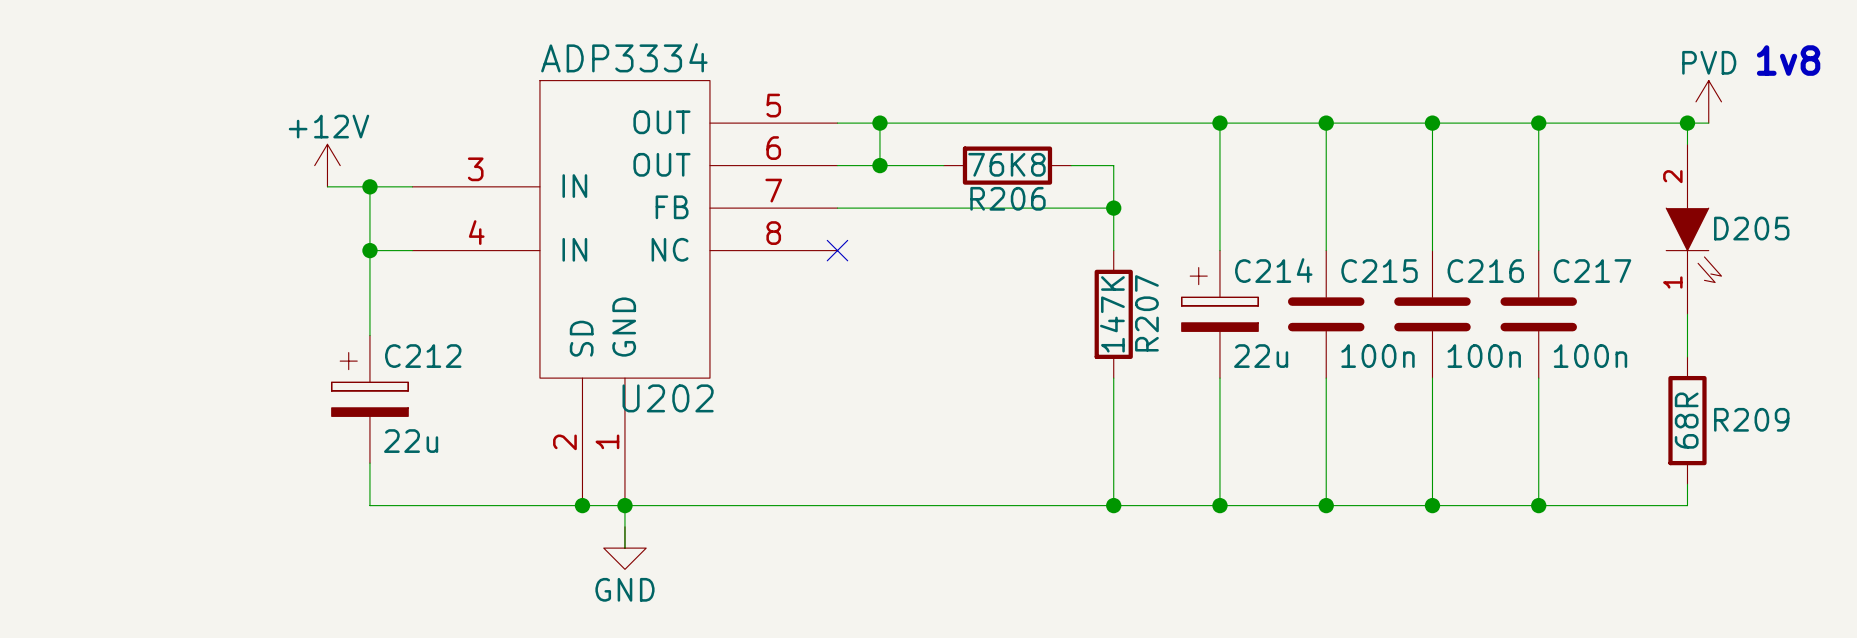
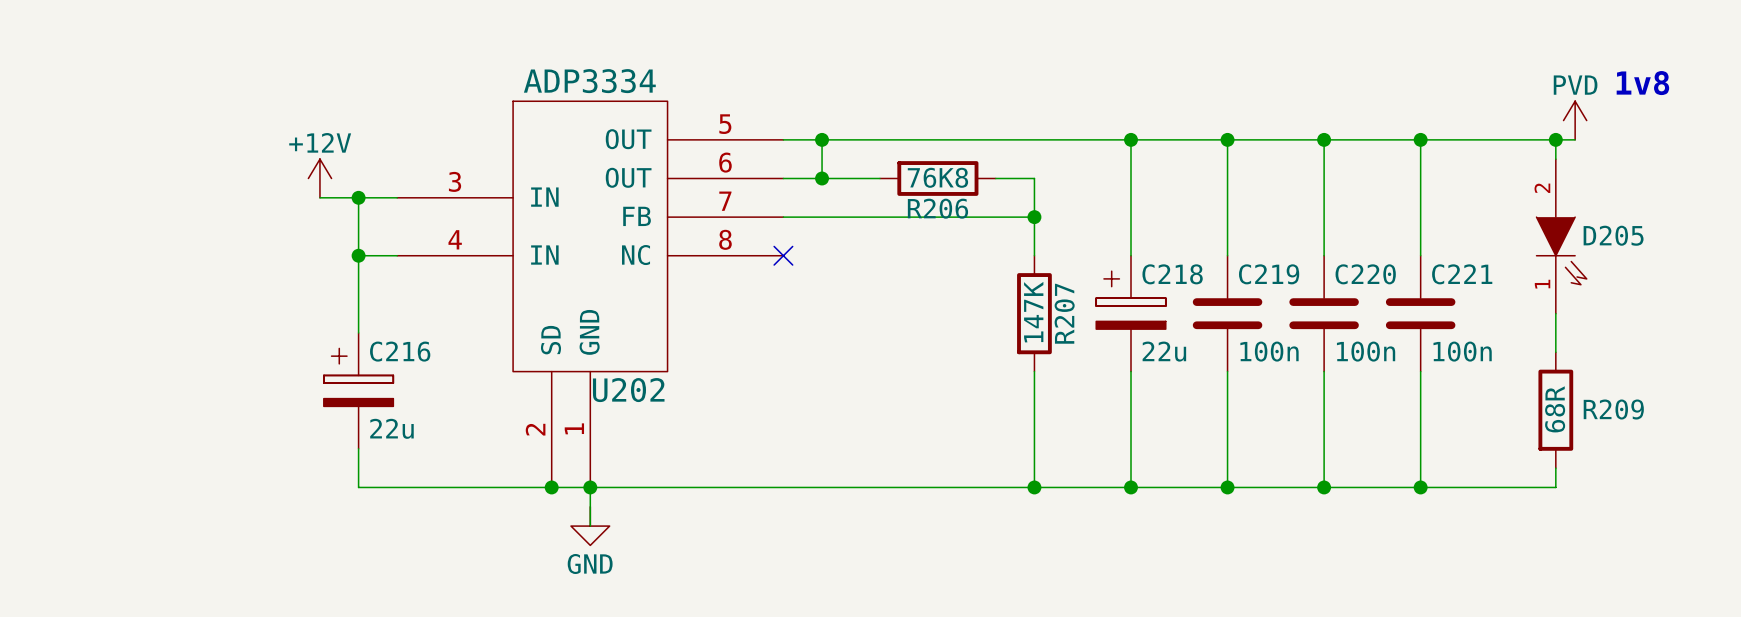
C214 name: C214 (1273, 270) -> C218 (1172, 274)
C215 name: C215 (1379, 271) -> C219 (1269, 274)
C216 name: C216 (1485, 271) -> C220 (1365, 274)
C217 name: C217 (1592, 271) -> C221 (1462, 274)
C212 name: C212 (423, 356) -> C216 (400, 351)

